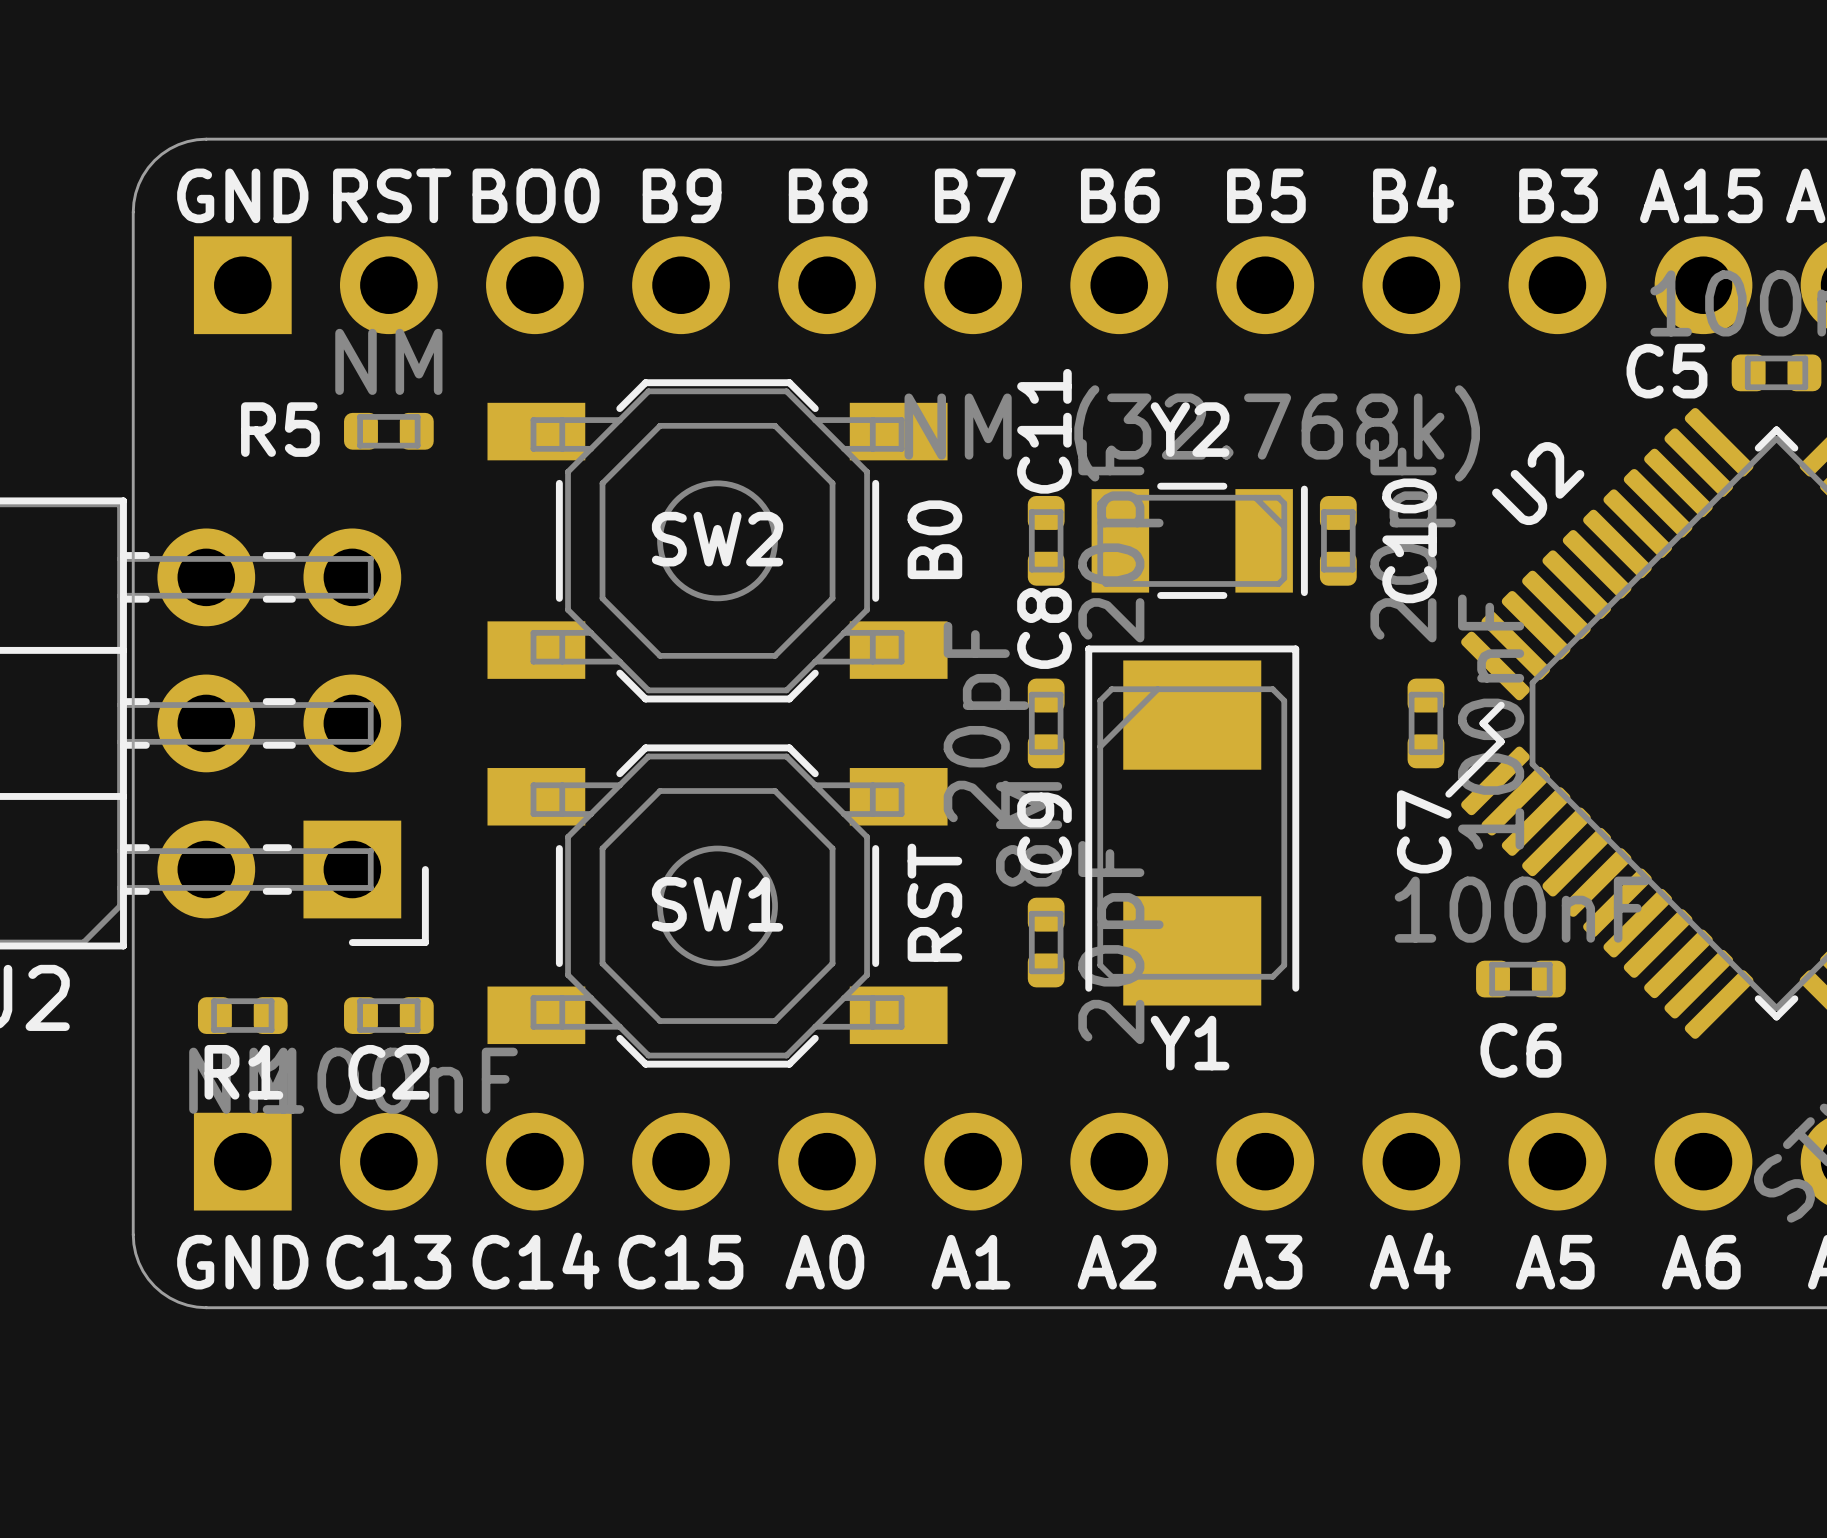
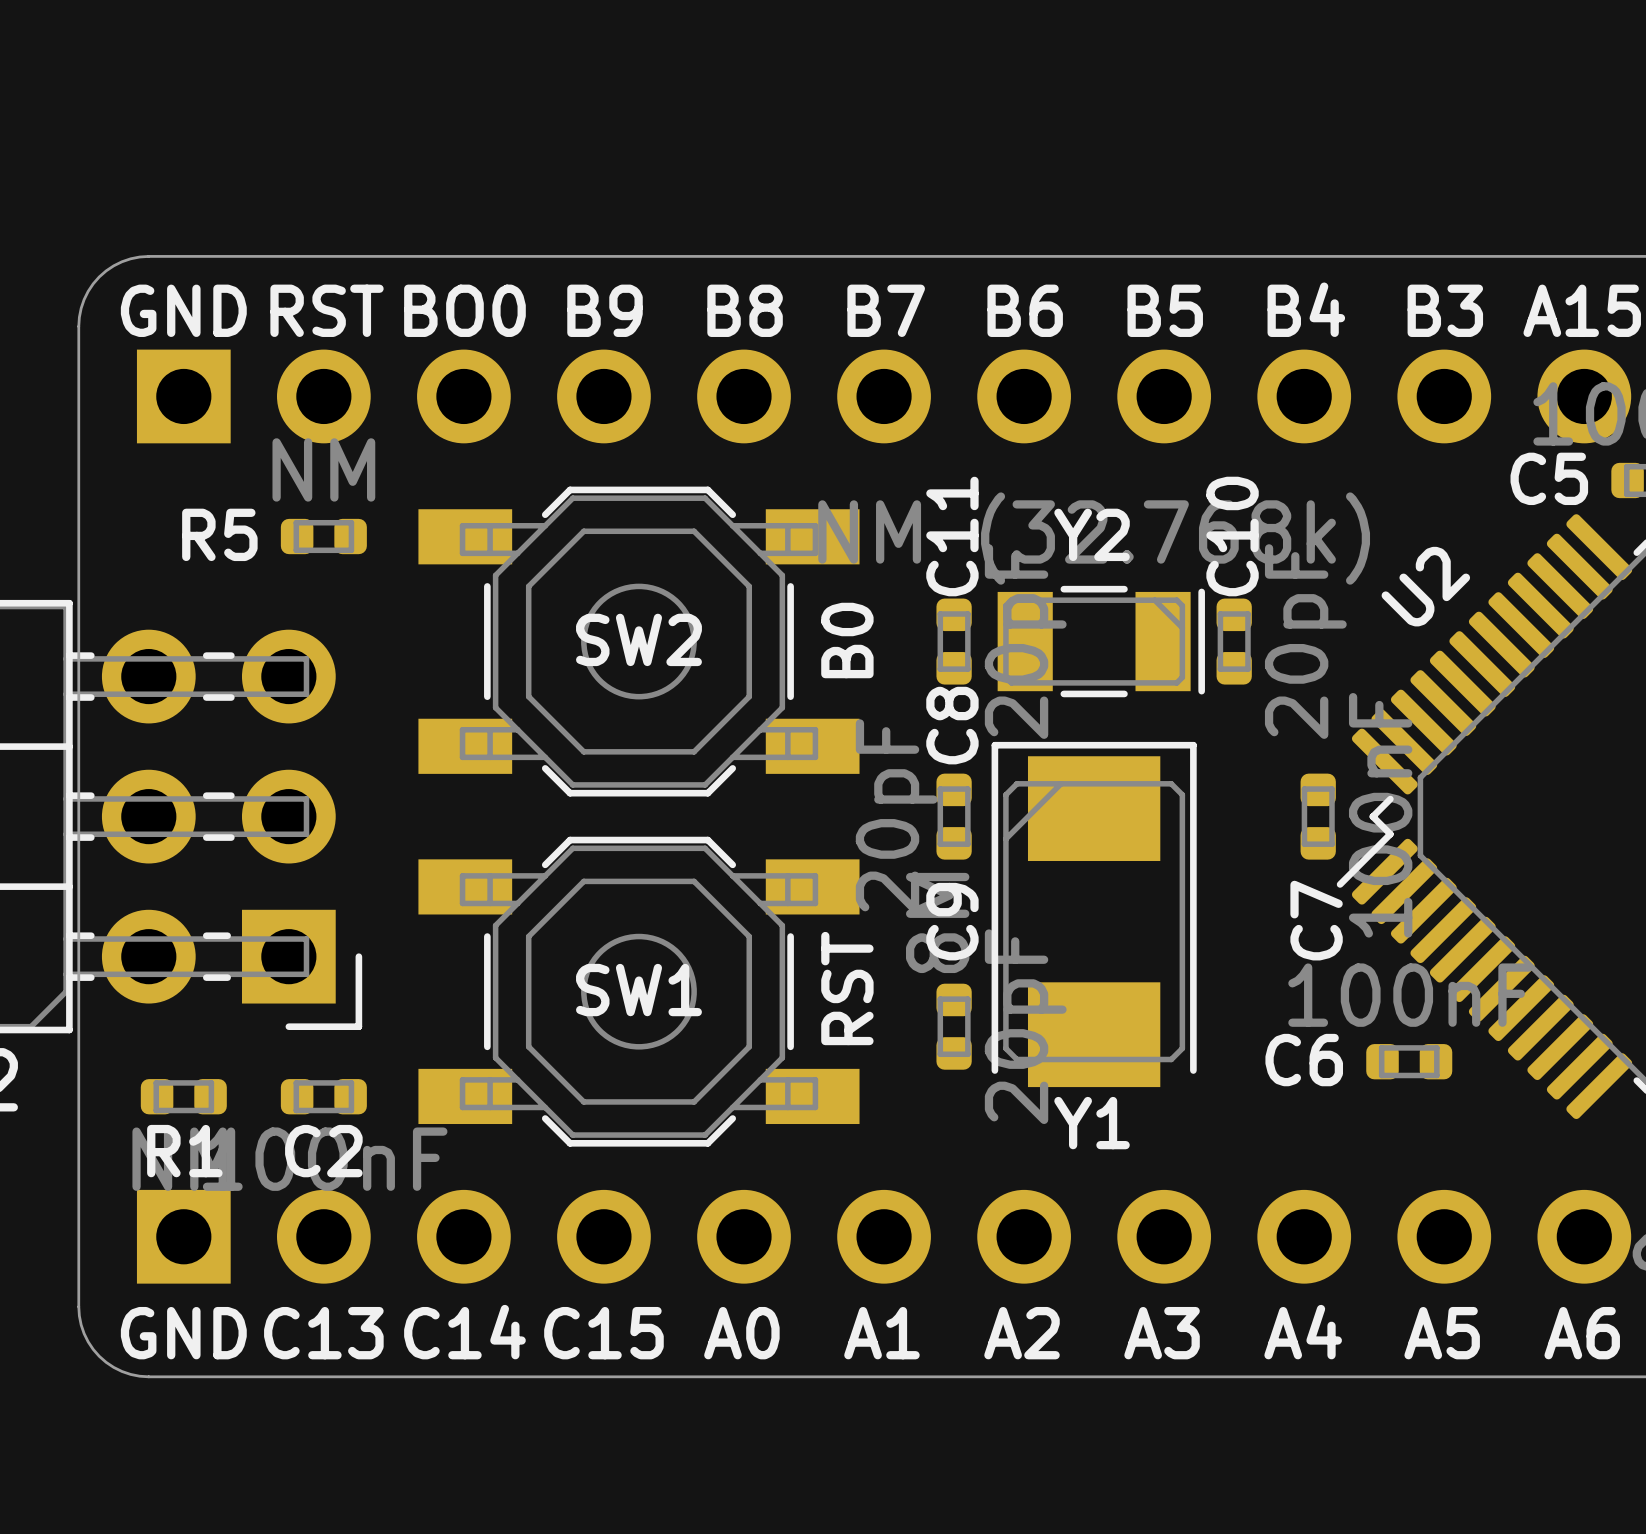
C10 name position: C10 (1409, 540) -> C10 (1232, 536)
C6 name position: C6 (1520, 1050) -> C6 (1304, 1060)

